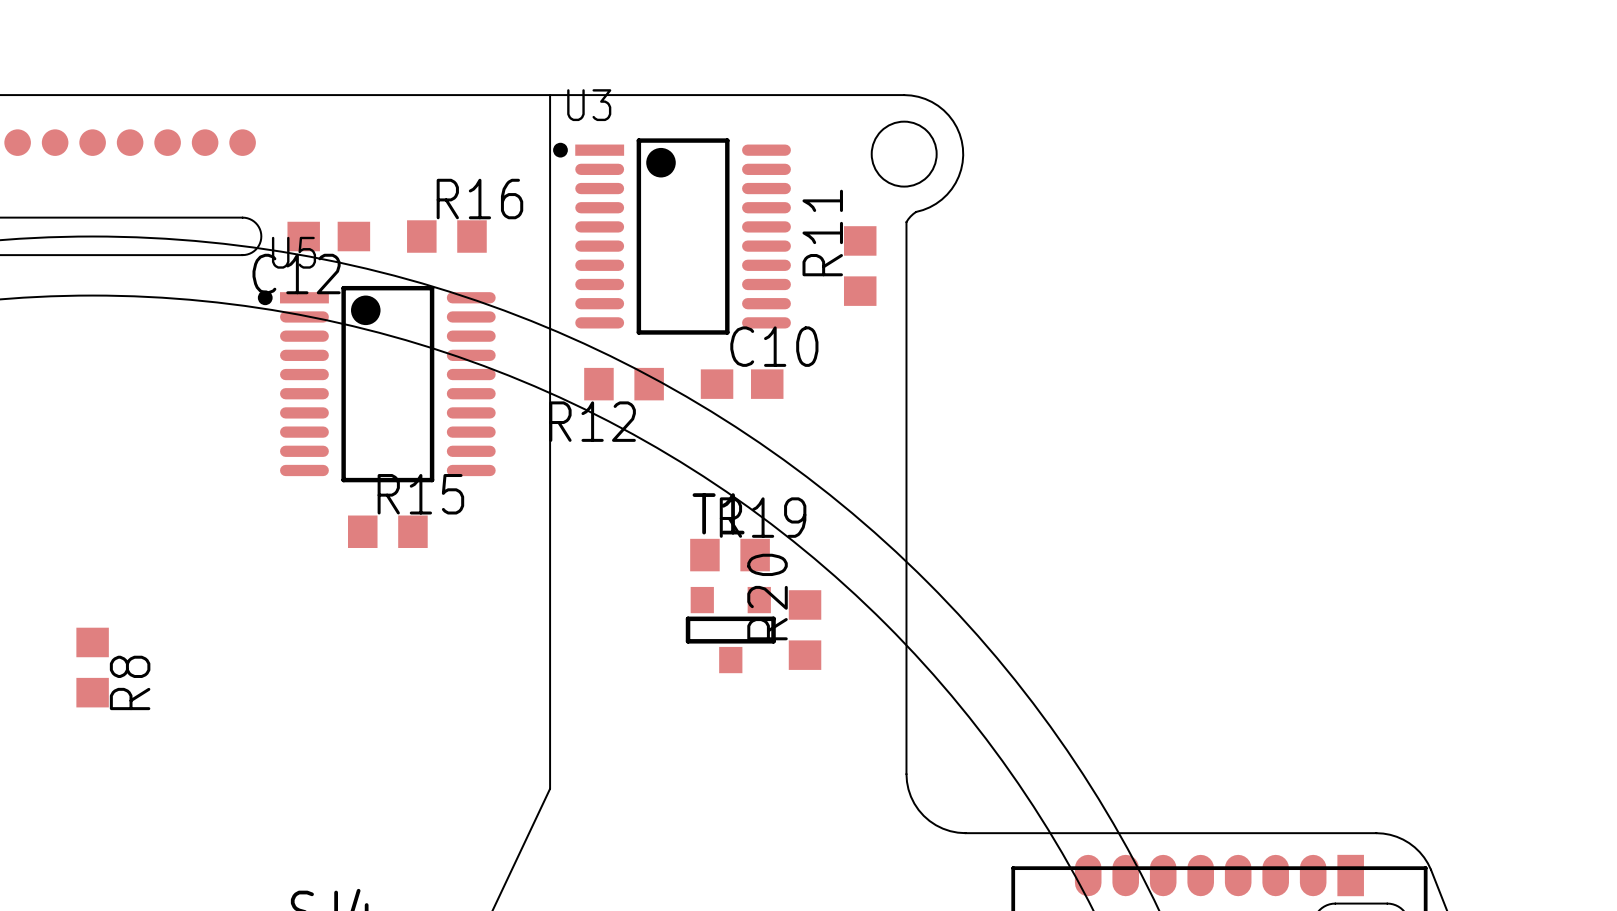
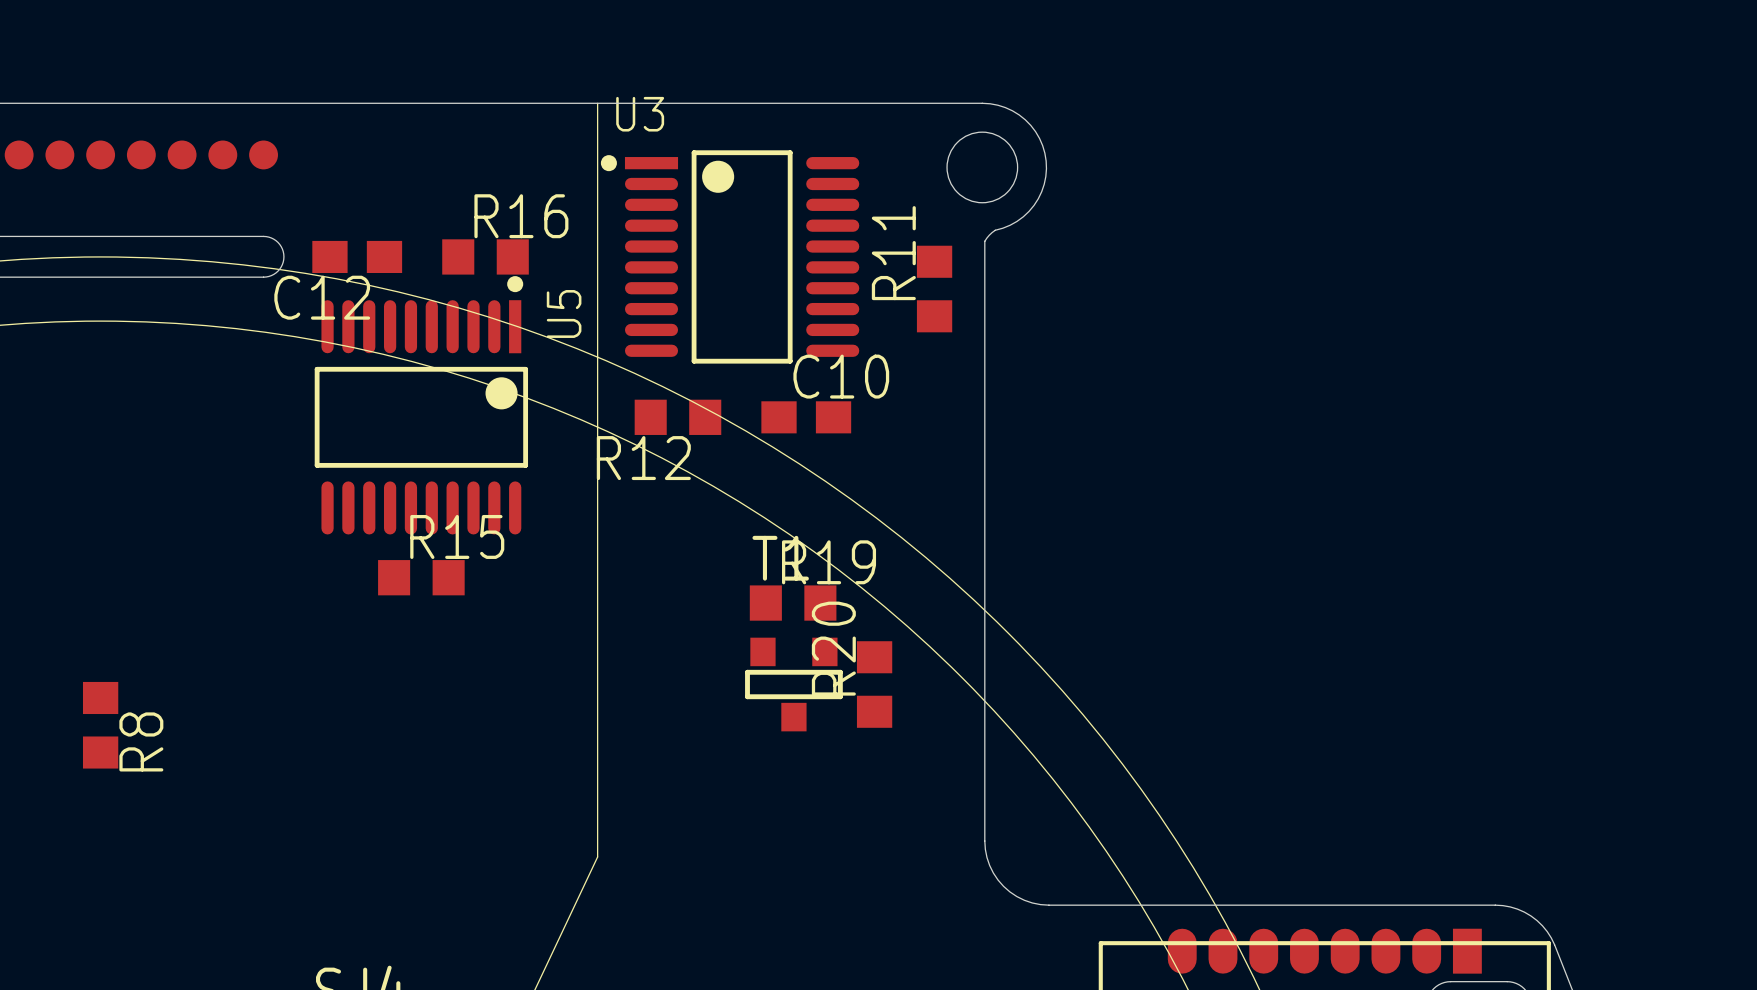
U5 rotation: 0° (376, 384) -> 90° clockwise (421, 405)

